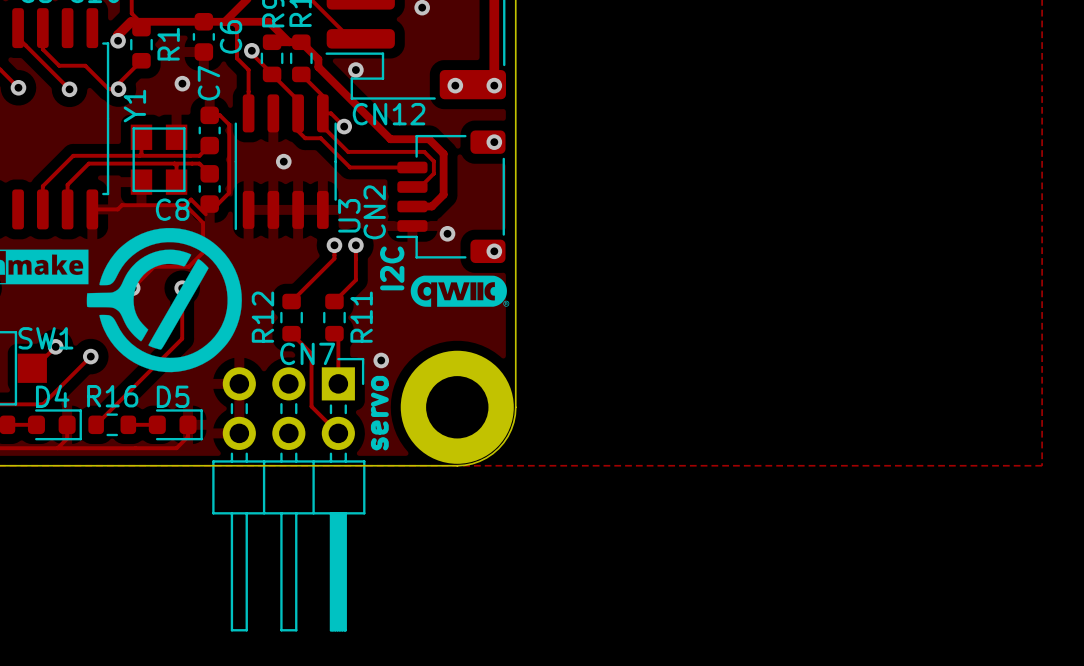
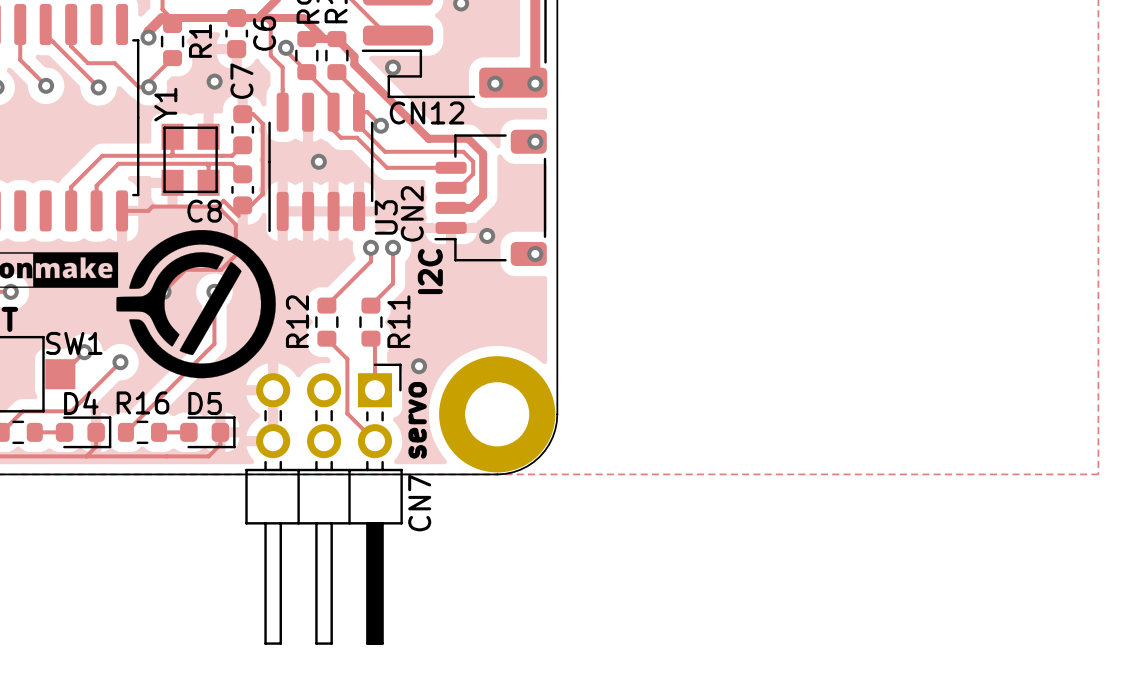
drawing: [410, 275, 510, 307] -> none
CN7 name rotation: 0° (307, 353) -> 90° counterclockwise (419, 503)
CN7 name position: CN7 (307, 353) -> CN7 (419, 503)

